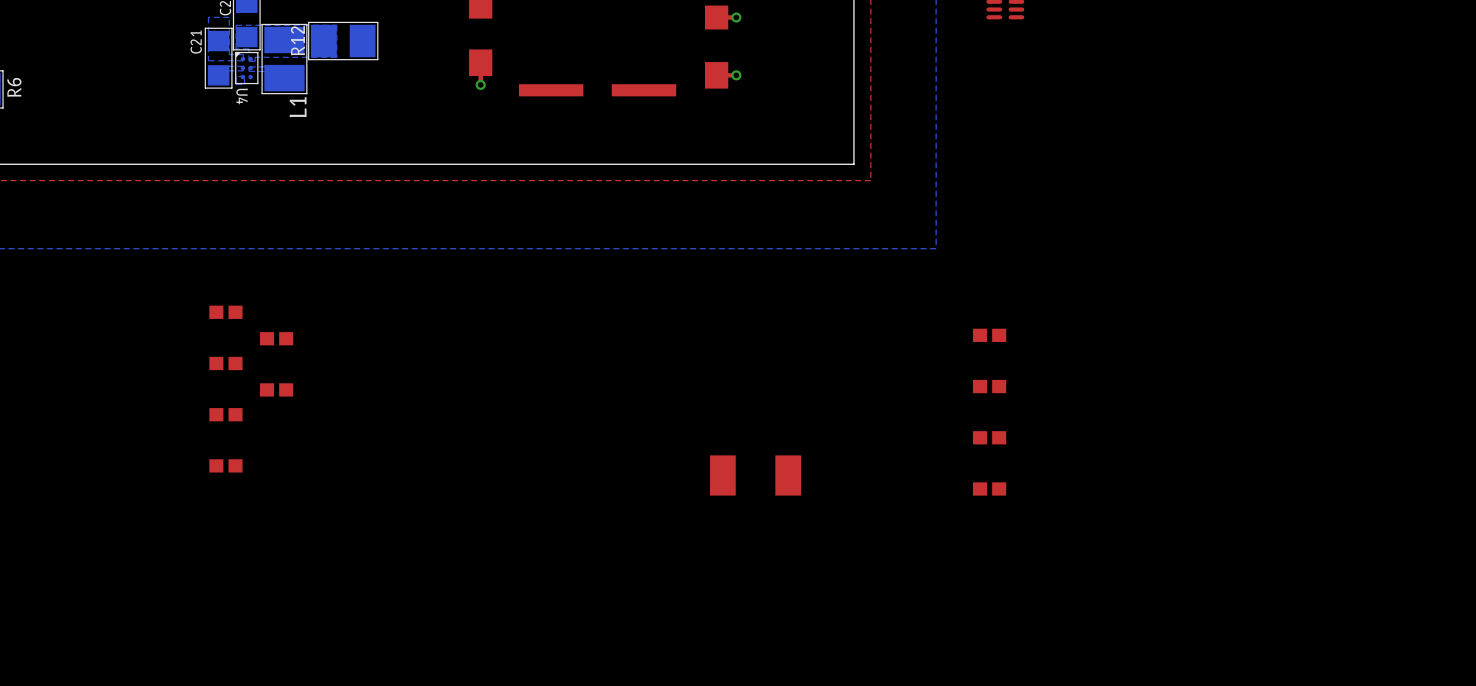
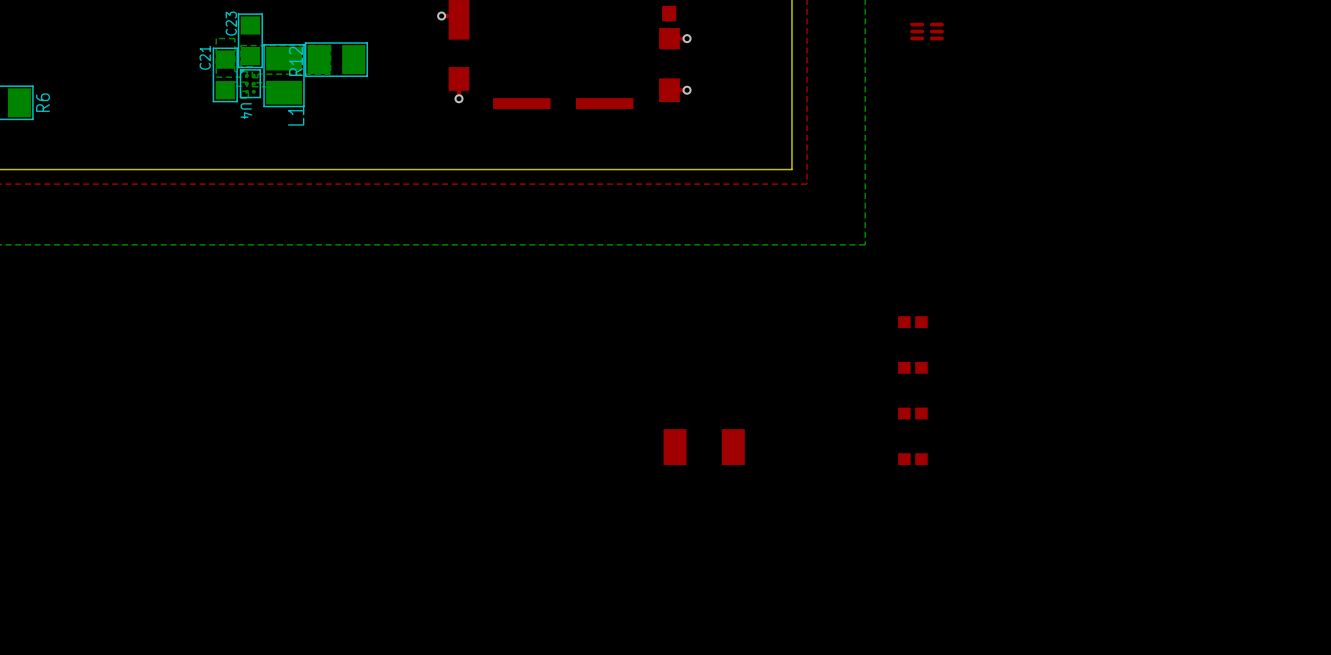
part: (225, 312) -> none
part: (276, 338) -> none
part: (225, 363) -> none
part: (276, 389) -> none
part: (225, 414) -> none
part: (225, 465) -> none

